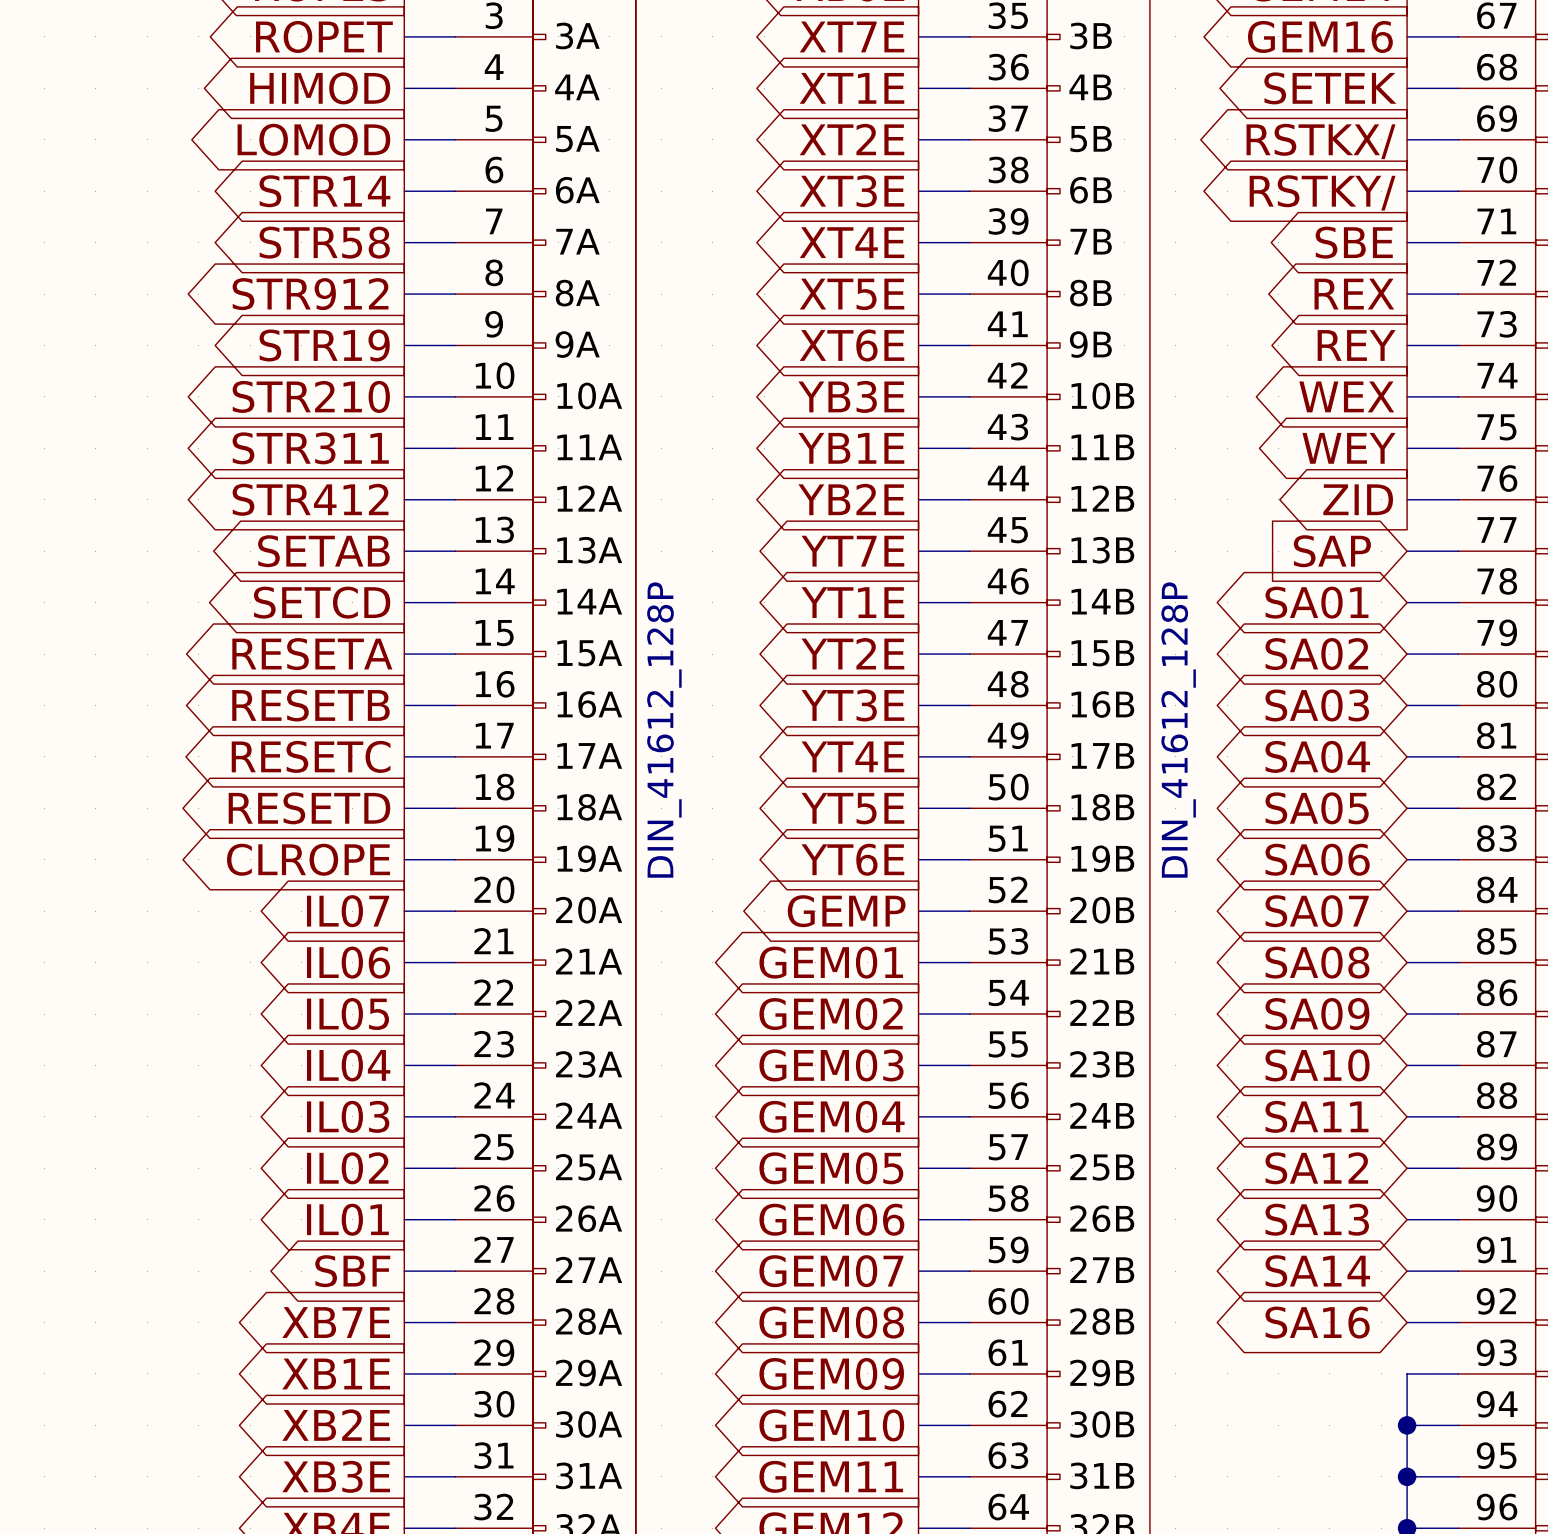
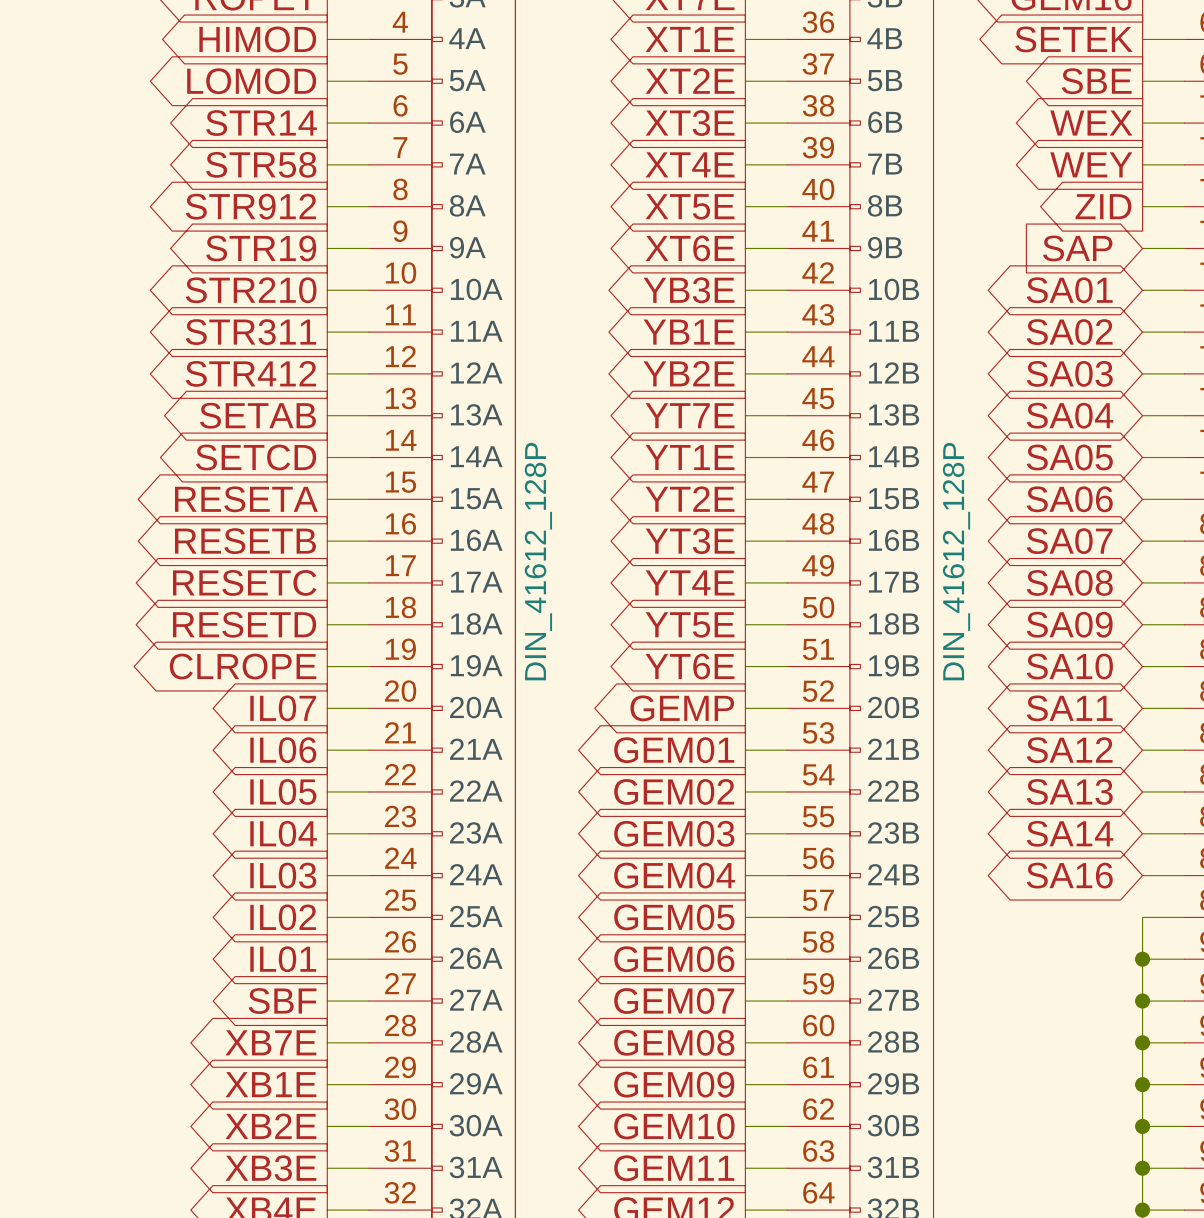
global label: RSTKX/ (1321, 141) -> SBE (1096, 81)
global label: RSTKY/ (1322, 192) -> WEX (1091, 123)
global label: SBE (1354, 242) -> WEY (1091, 164)
global label: REX (1354, 294) -> ZID (1103, 206)
global label shape: output (1356, 345) -> input (1077, 248)
global label: REY (1356, 345) -> SAP (1077, 248)
global label shape: output (1346, 396) -> bidirectional (1069, 290)
global label: WEX (1346, 396) -> SA01 (1069, 290)
global label shape: output (1349, 448) -> bidirectional (1069, 332)
global label: WEY (1349, 448) -> SA02 (1069, 332)
global label shape: output (1358, 499) -> bidirectional (1069, 373)
global label: ZID (1358, 499) -> SA03 (1069, 373)
global label shape: input (1332, 551) -> bidirectional (1070, 415)
global label: SAP (1332, 551) -> SA04 (1070, 415)
global label: SA01 (1316, 602) -> SA05 (1069, 457)
global label: SA02 (1316, 654) -> SA06 (1069, 499)
global label: SA03 (1317, 705) -> SA07 (1069, 541)
global label: SA04 (1317, 756) -> SA08 (1069, 582)
global label: SA05 (1317, 808) -> SA09 (1069, 624)
global label: SA06 (1317, 859) -> SA10 (1069, 666)
global label: SA07 (1317, 911) -> SA11 (1069, 708)
global label: SA08 (1317, 962) -> SA12 (1069, 750)
global label: SA09 (1317, 1014) -> SA13 (1069, 791)
global label: SA10 (1317, 1065) -> SA14 (1070, 833)
global label: SA11 (1316, 1116) -> SA16 (1069, 875)
global label: SA12 (1316, 1168) -> none
wire: none -> (1142, 917) (1142, 1084)
global label: SA13 (1317, 1219) -> none
junction: none -> (1142, 959)
global label: SA14 (1317, 1271) -> none
junction: none -> (1142, 1001)
global label: SA16 (1317, 1322) -> none
junction: none -> (1142, 1042)
junction: none -> (1142, 1084)

